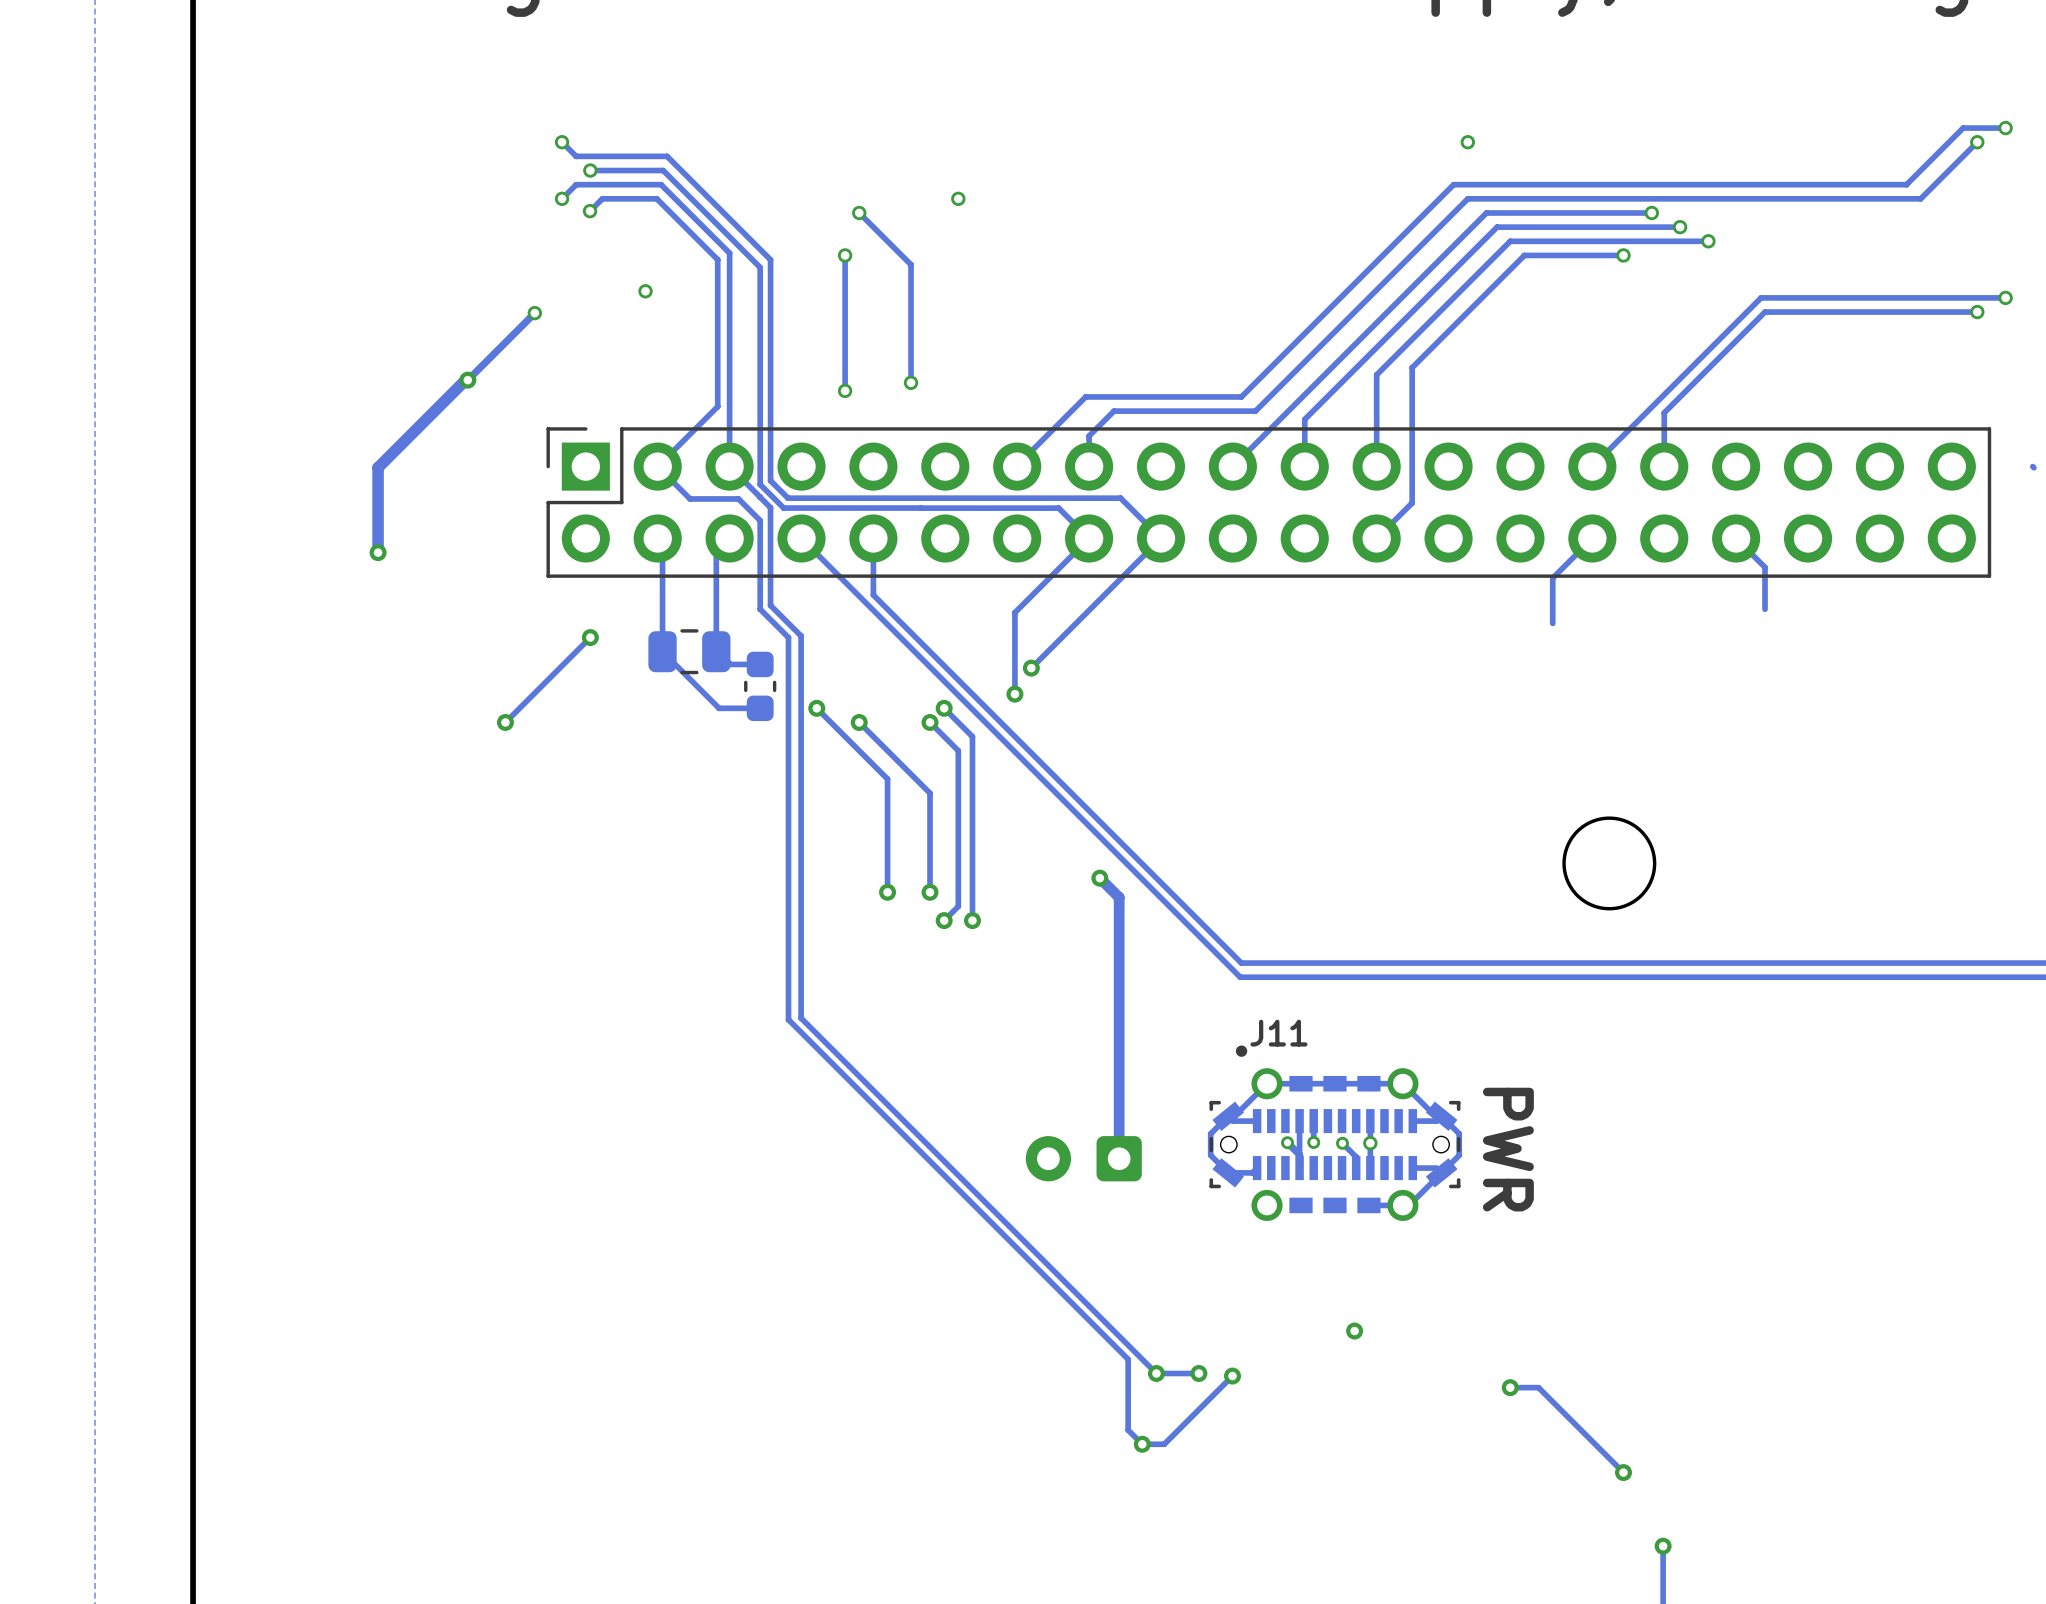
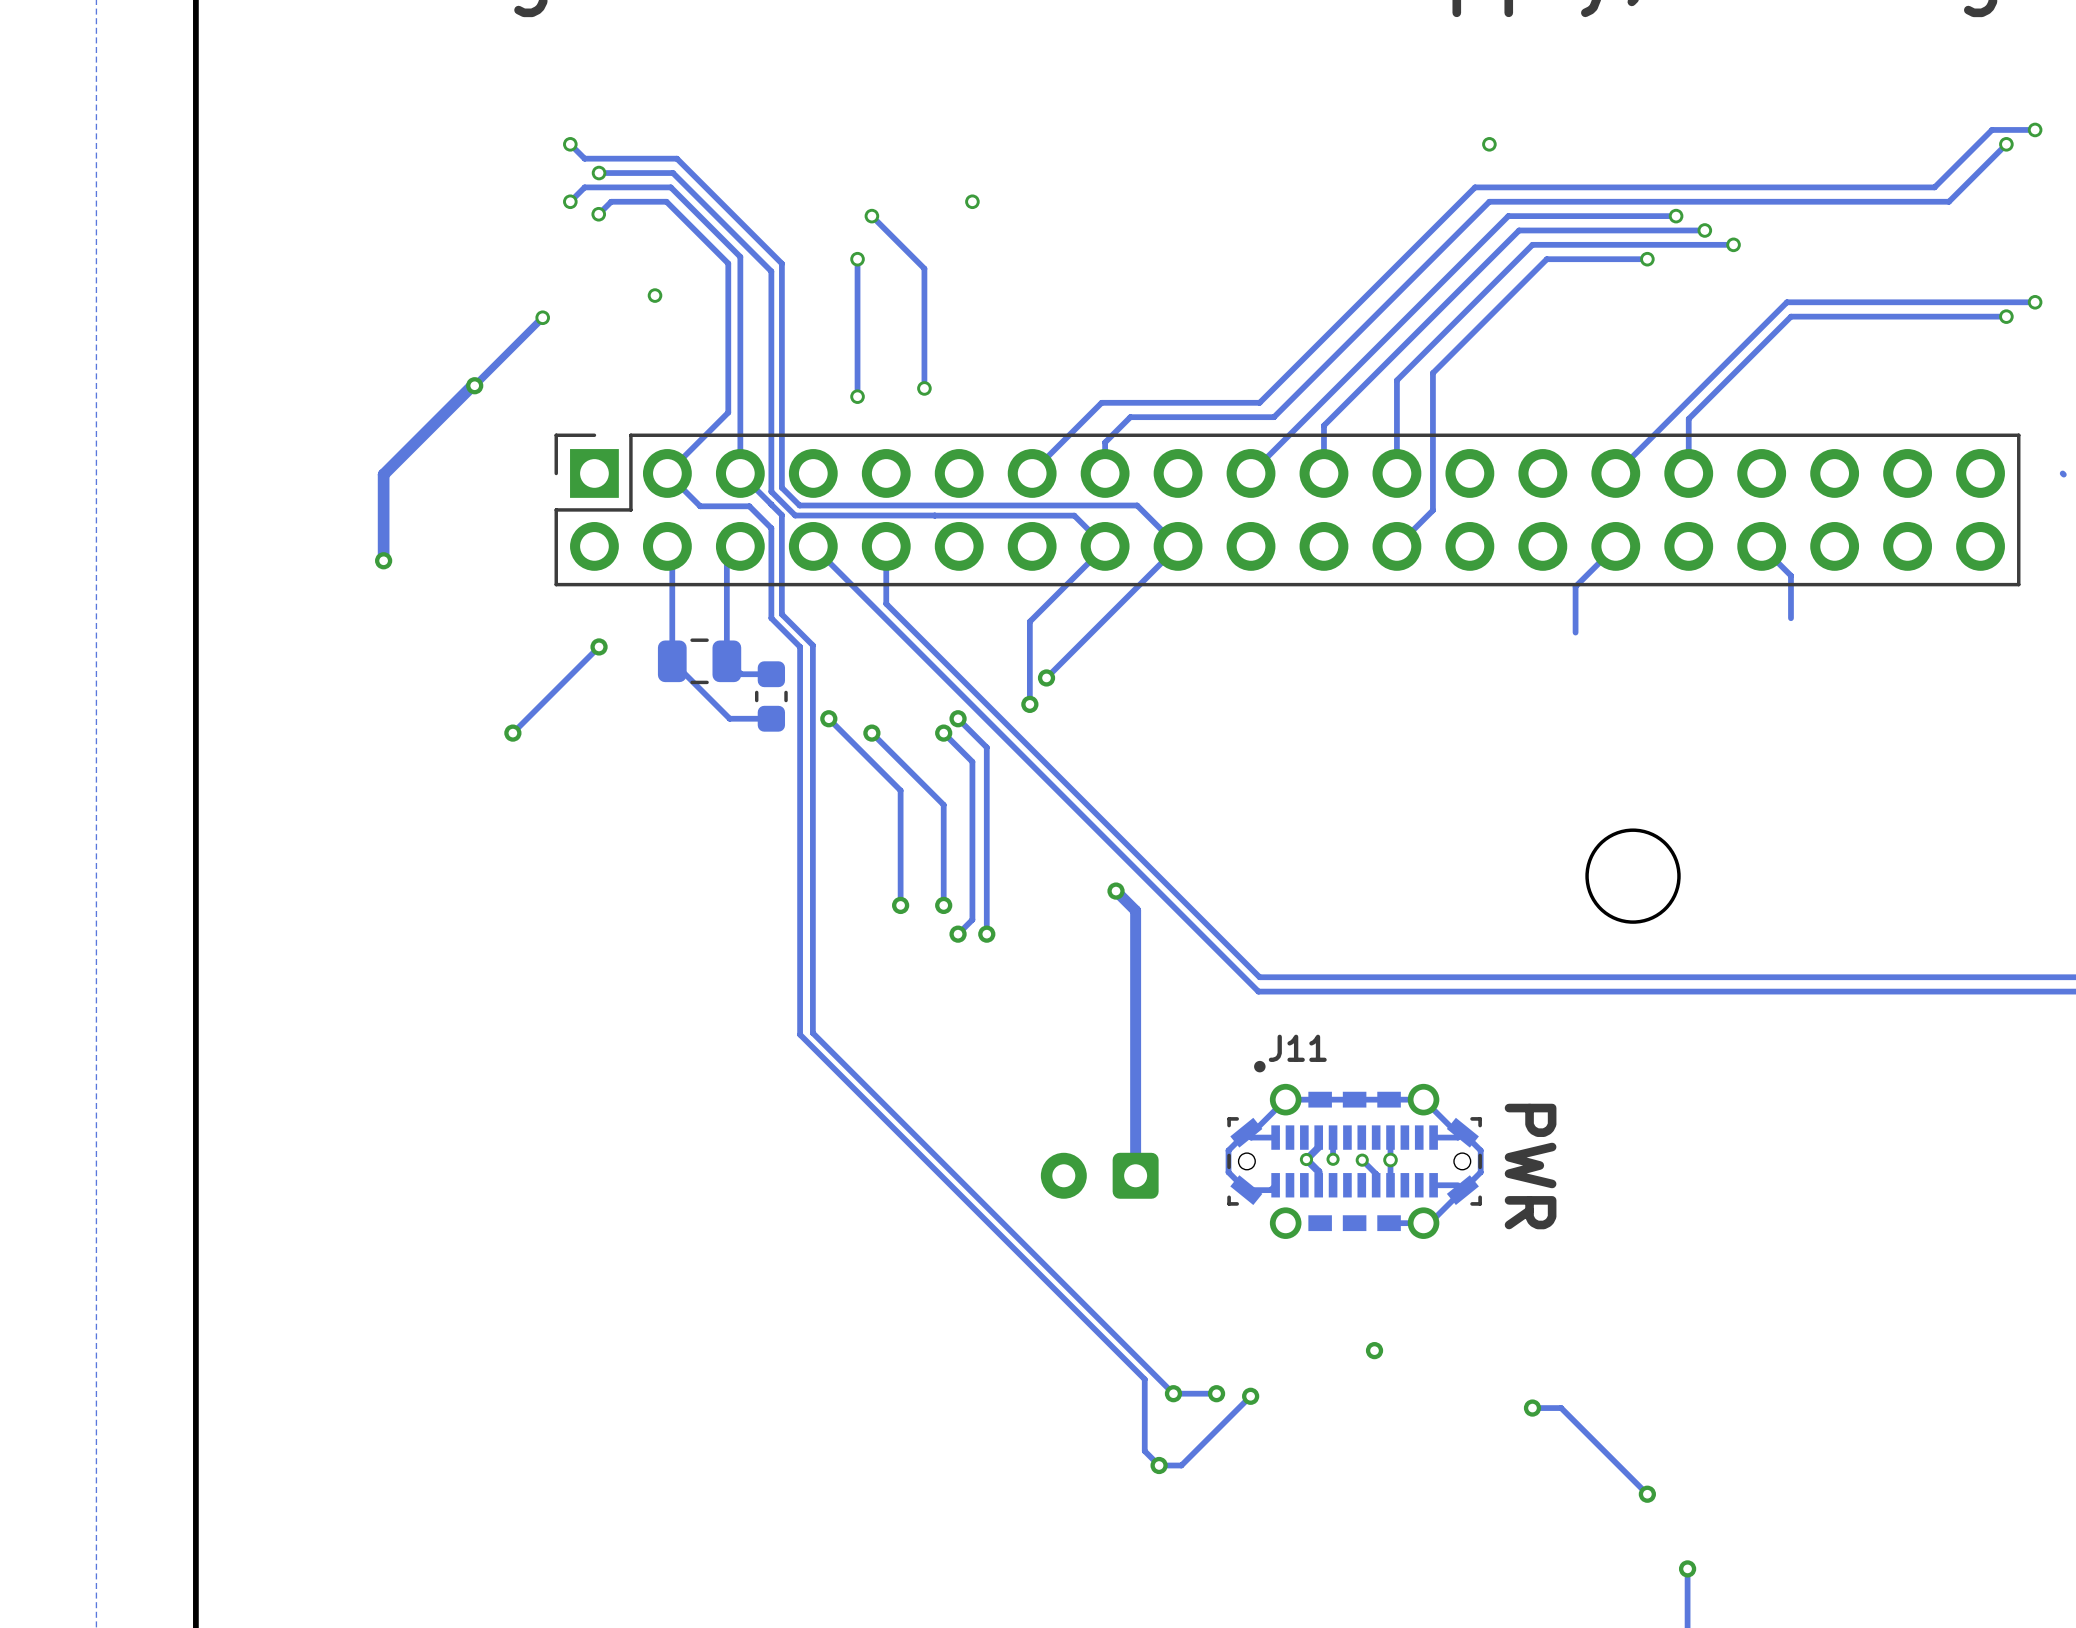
track: (1299, 1130) (1299, 1154) -> (1318, 1147) (1306, 1159)

